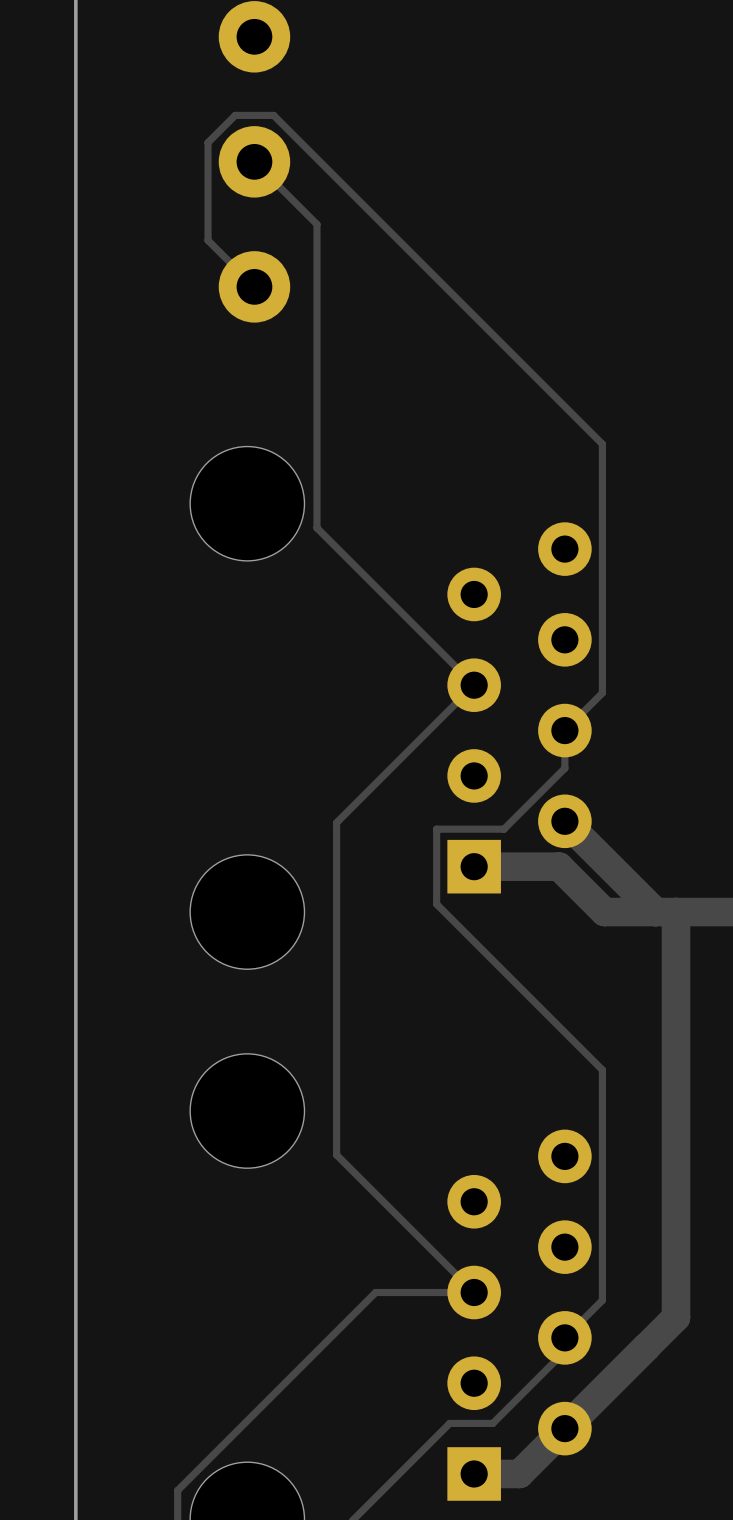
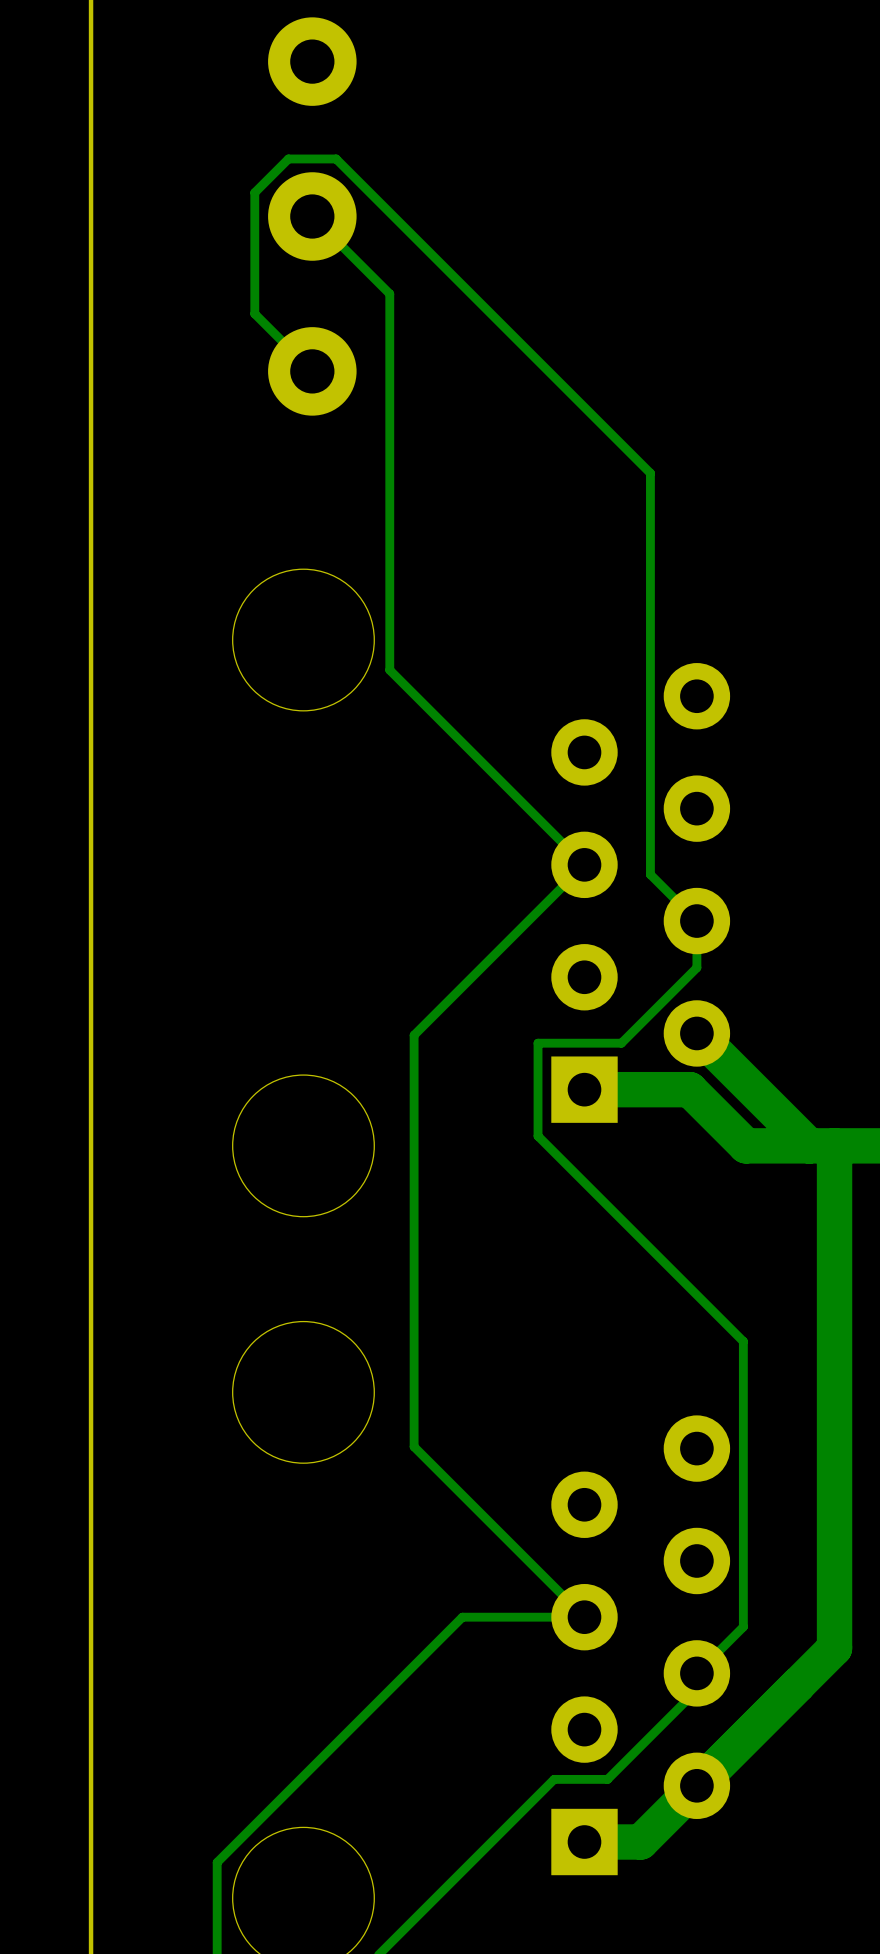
track: (527, 369) (602, 444) (602, 693) (564, 730) -> (650, 473) (650, 874) (696, 921)

